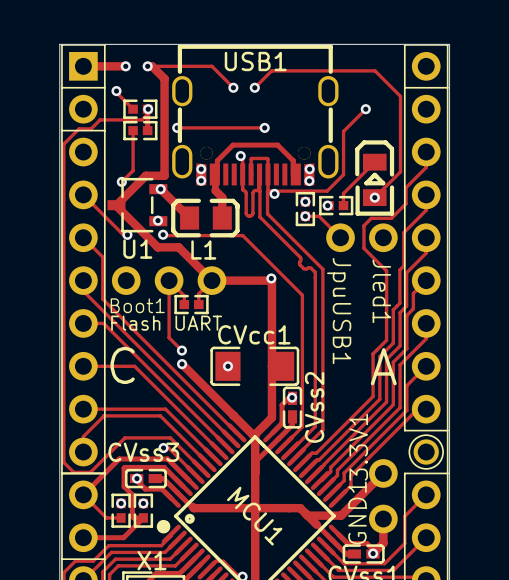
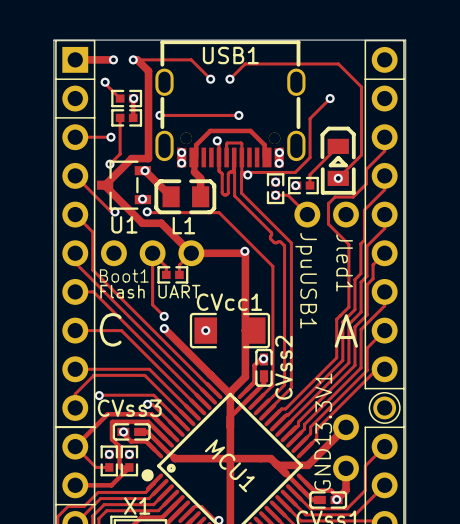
track: (148, 109) (148, 113) (142, 119) (100, 119) (91, 128) (79, 128) (63, 144) (63, 462) (73, 472) (90, 472) (124, 437) -> (99, 395) (112, 395)
track: none -> (75, 137) (110, 137)
via: none -> (110, 137)
via: none -> (99, 395)

